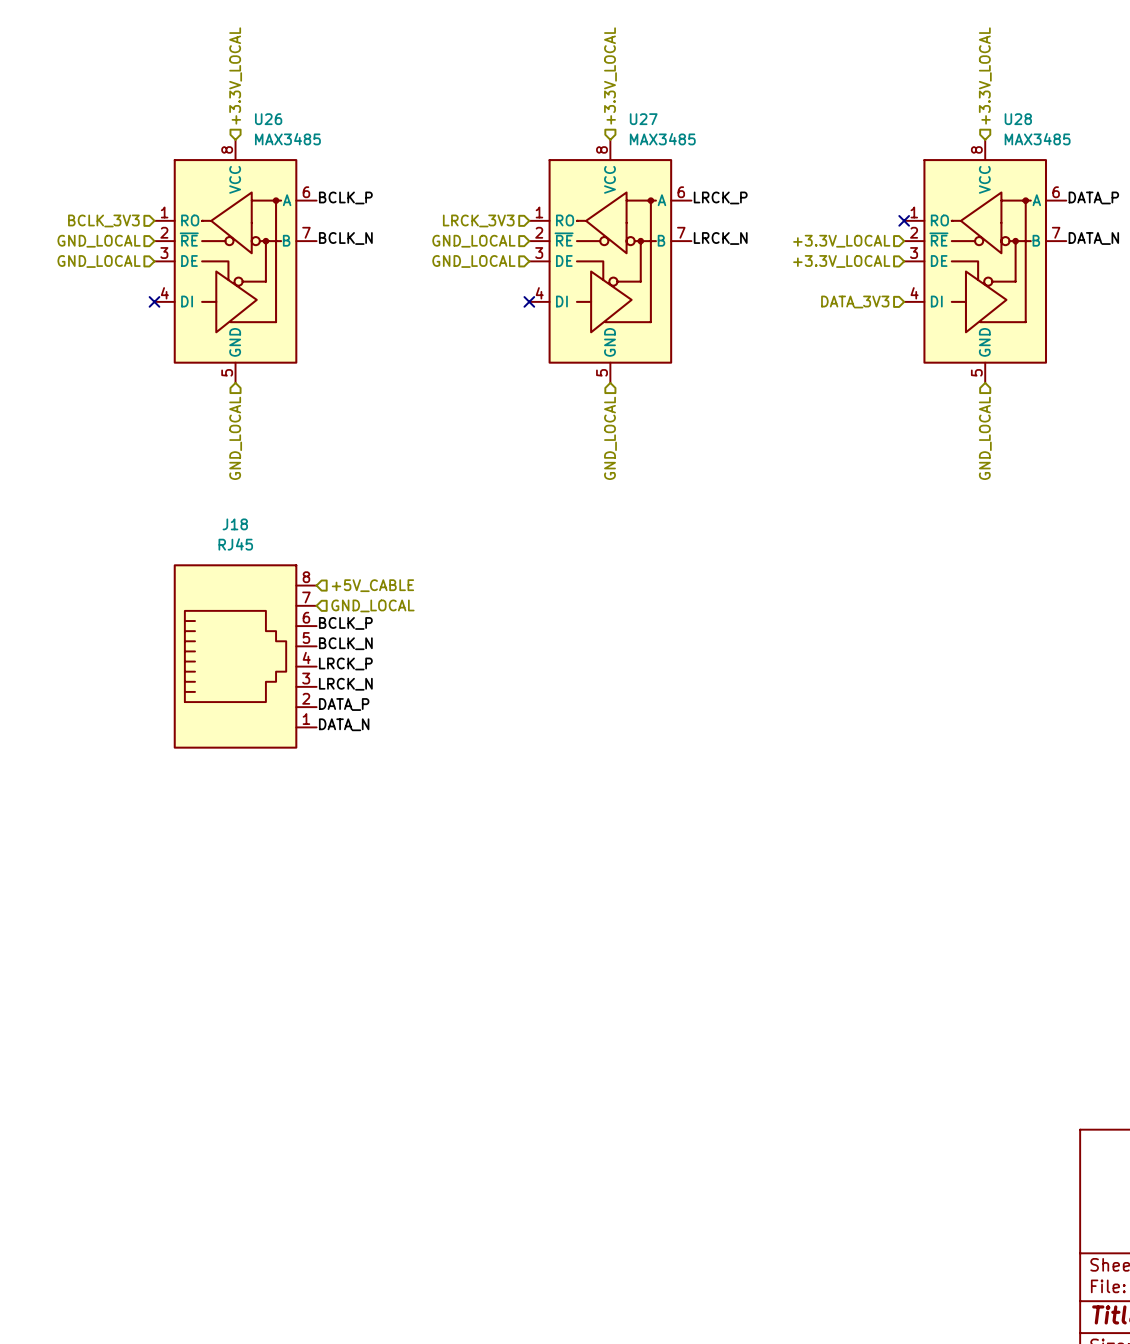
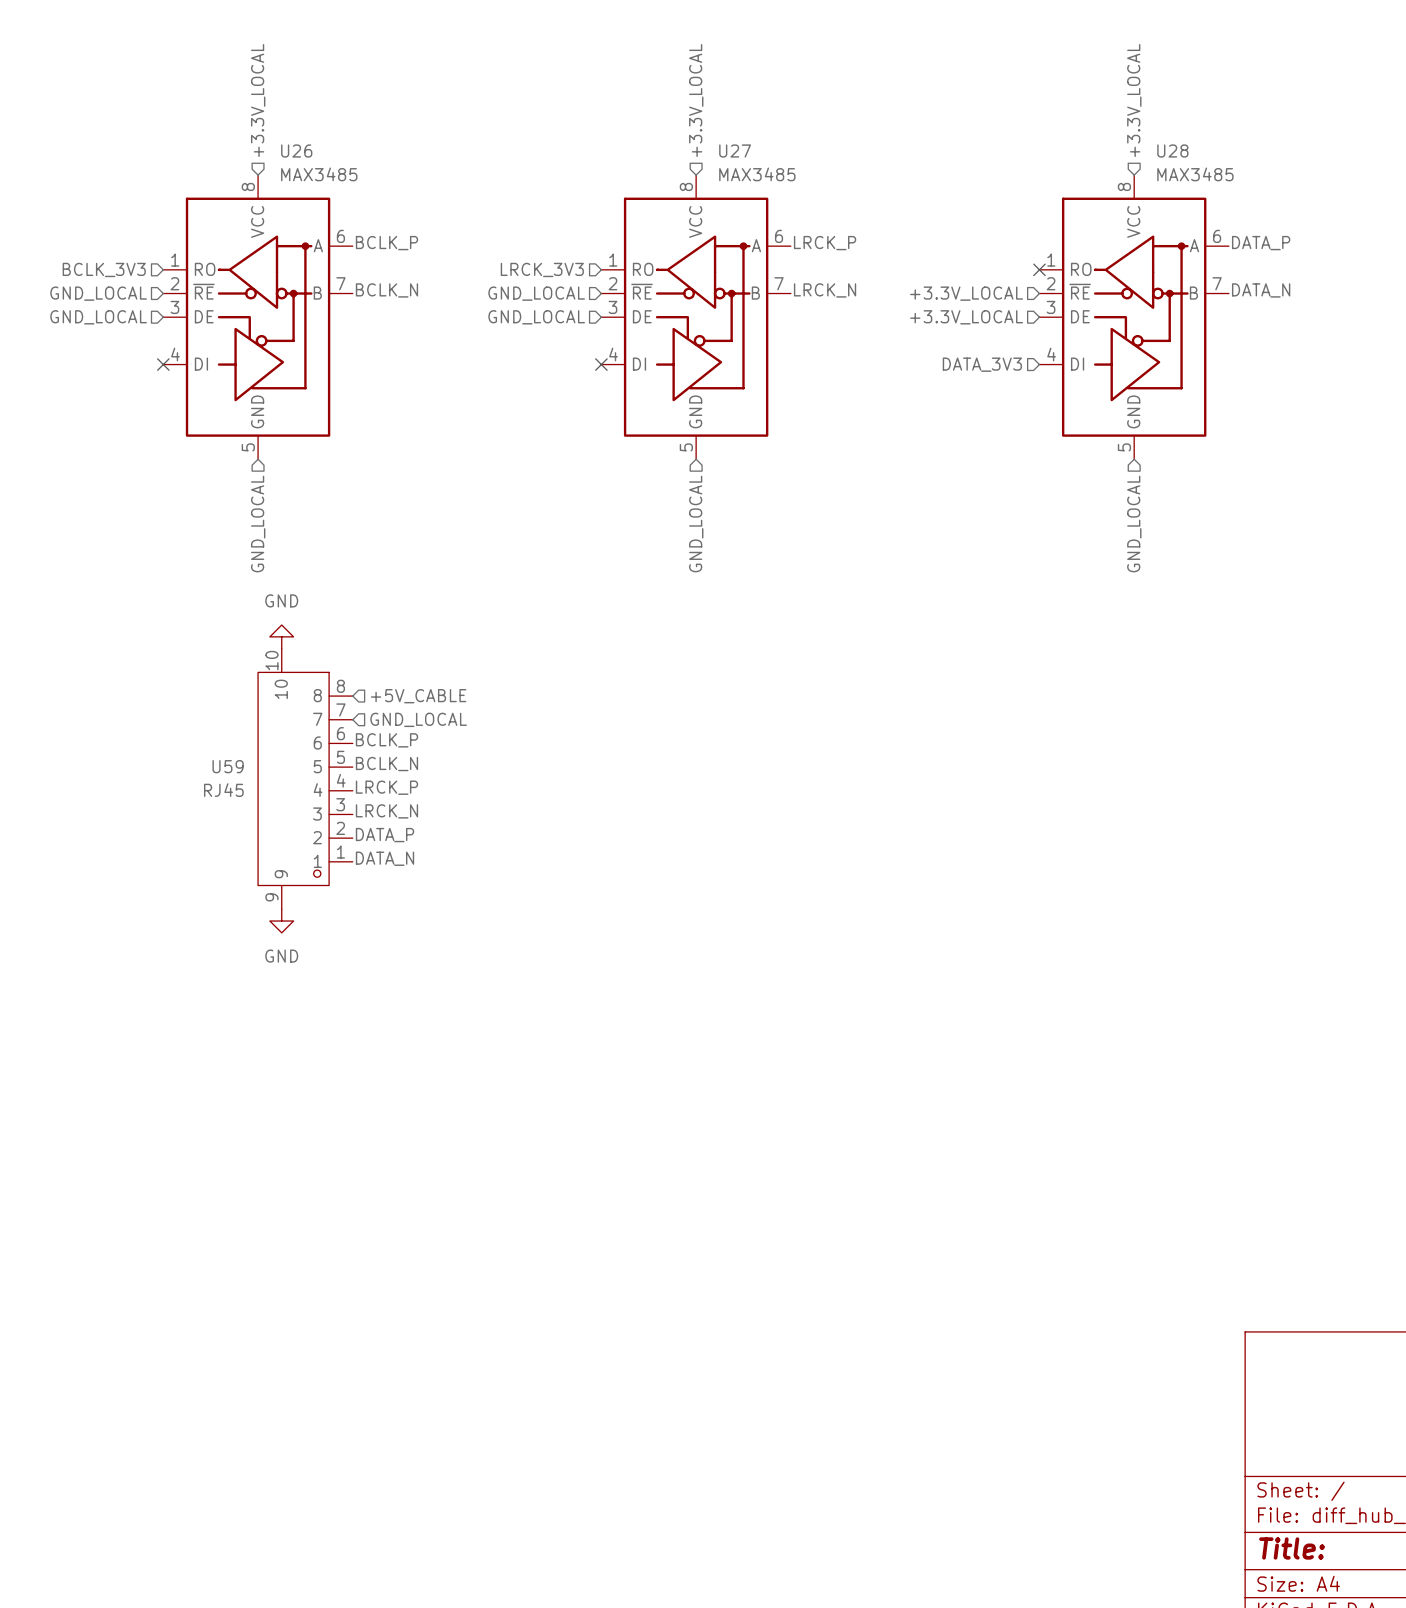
power symbol: none -> GND (281, 636)
J18: RJ45 (245, 656) -> none
U59: none -> RJ45 (305, 778)
power symbol: none -> GND (281, 921)

